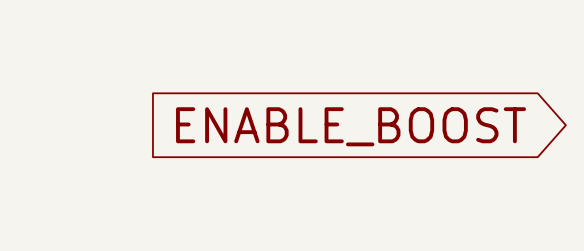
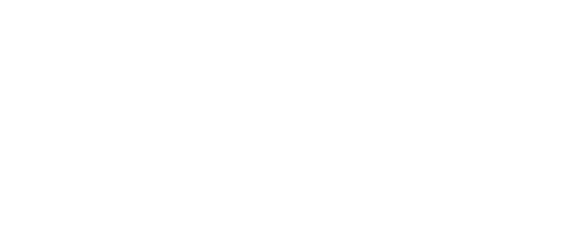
global label: ENABLE_BOOST (351, 126) -> none

